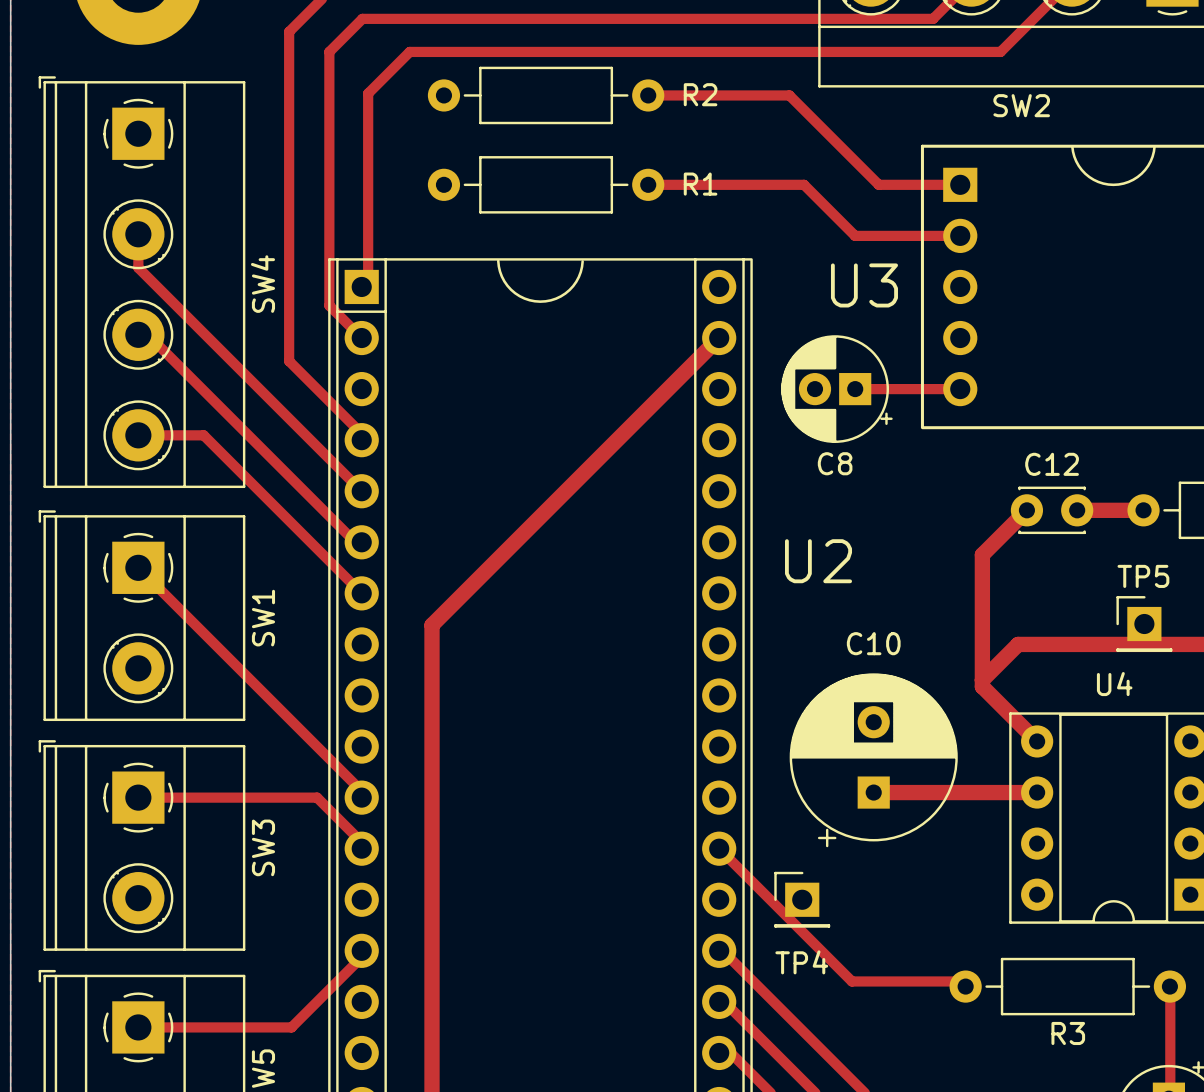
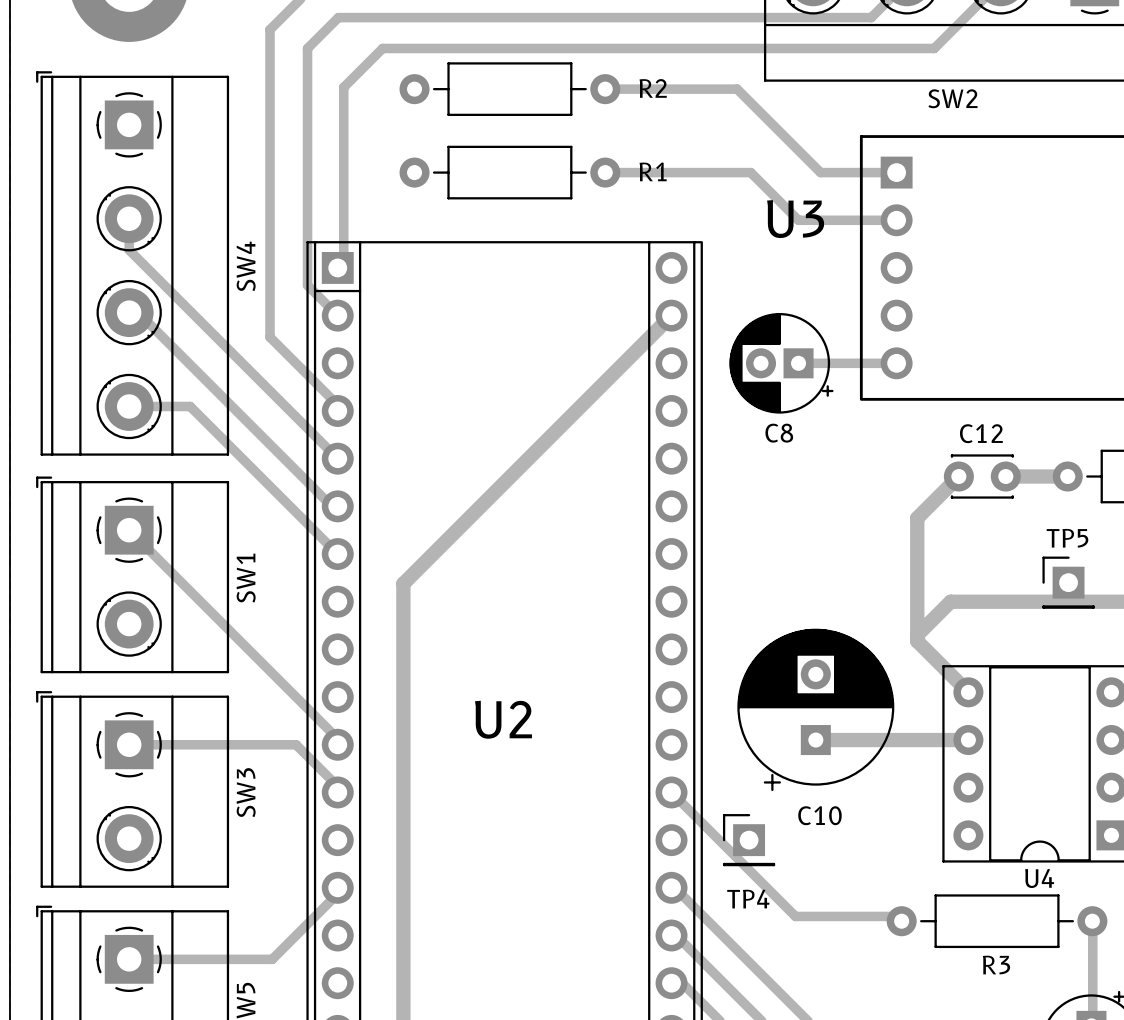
line: (1072, 146) (1076, 161) (1085, 173) (1098, 181) (1113, 184) (1128, 181) (1141, 173) (1150, 161) (1154, 146) -> none
line: (498, 260) (501, 276) (511, 289) (524, 298) (540, 301) (556, 298) (569, 290) (578, 277) (582, 261) -> none
U3 name position: U3 (864, 285) -> U3 (795, 219)
U2 name position: U2 (818, 561) -> U2 (503, 719)
C10 name position: C10 (873, 643) -> C10 (819, 815)
U4 name position: U4 (1114, 684) -> U4 (1039, 878)

